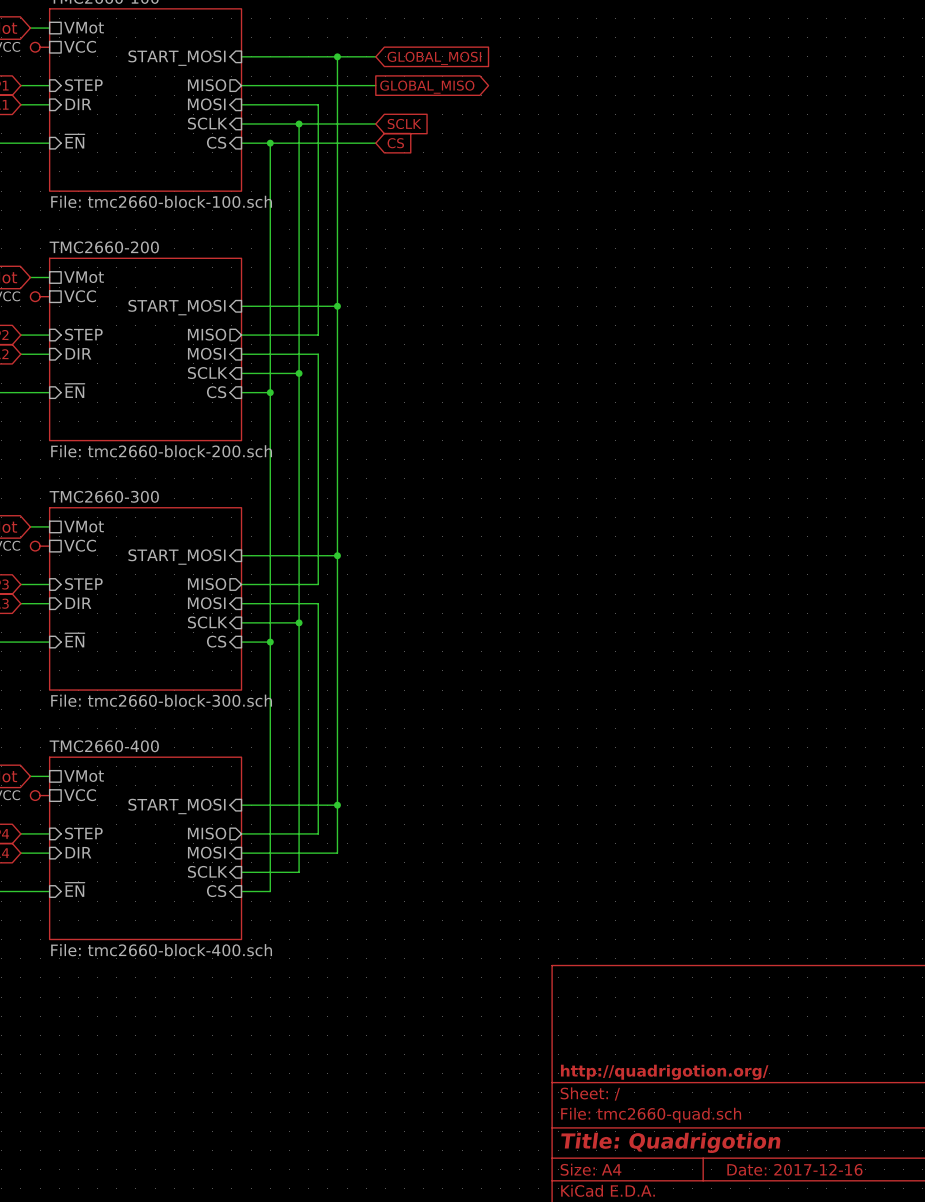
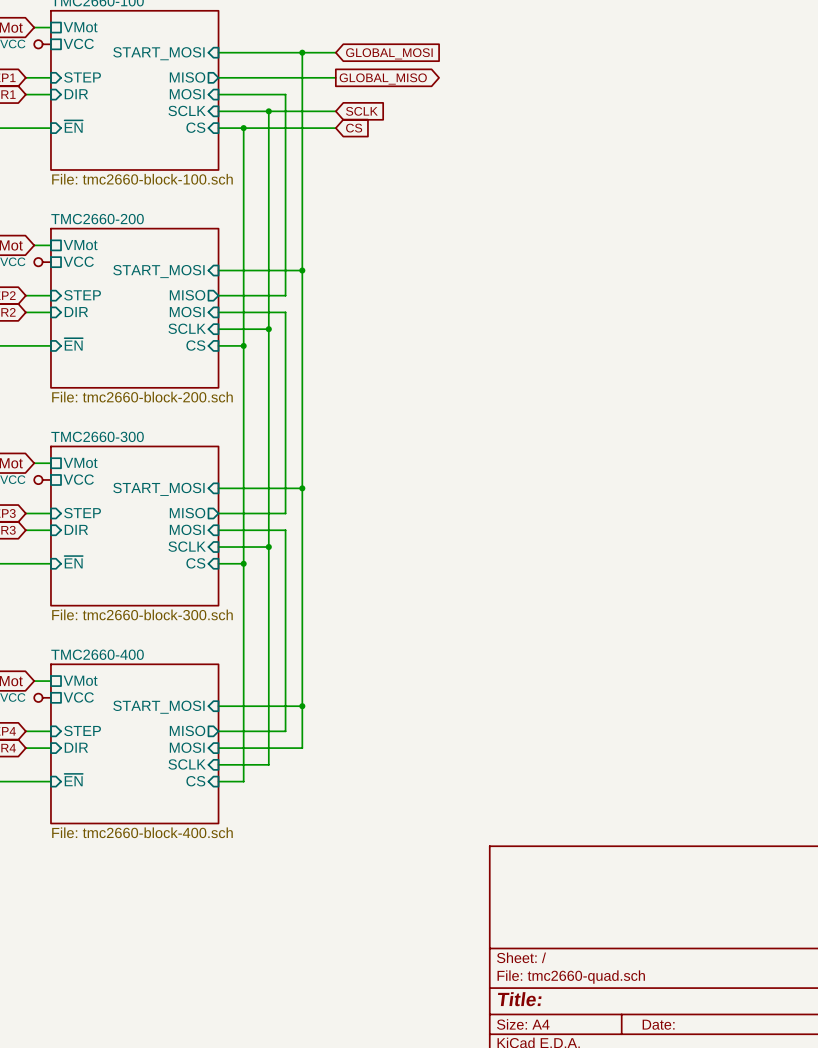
title block: http://quadrigotion.org/ (664, 1072) -> none
title block: Title: Quadrigotion (670, 1142) -> Title: (519, 999)
title block: Date: 2017-12-16 (794, 1169) -> Date: (658, 1024)

